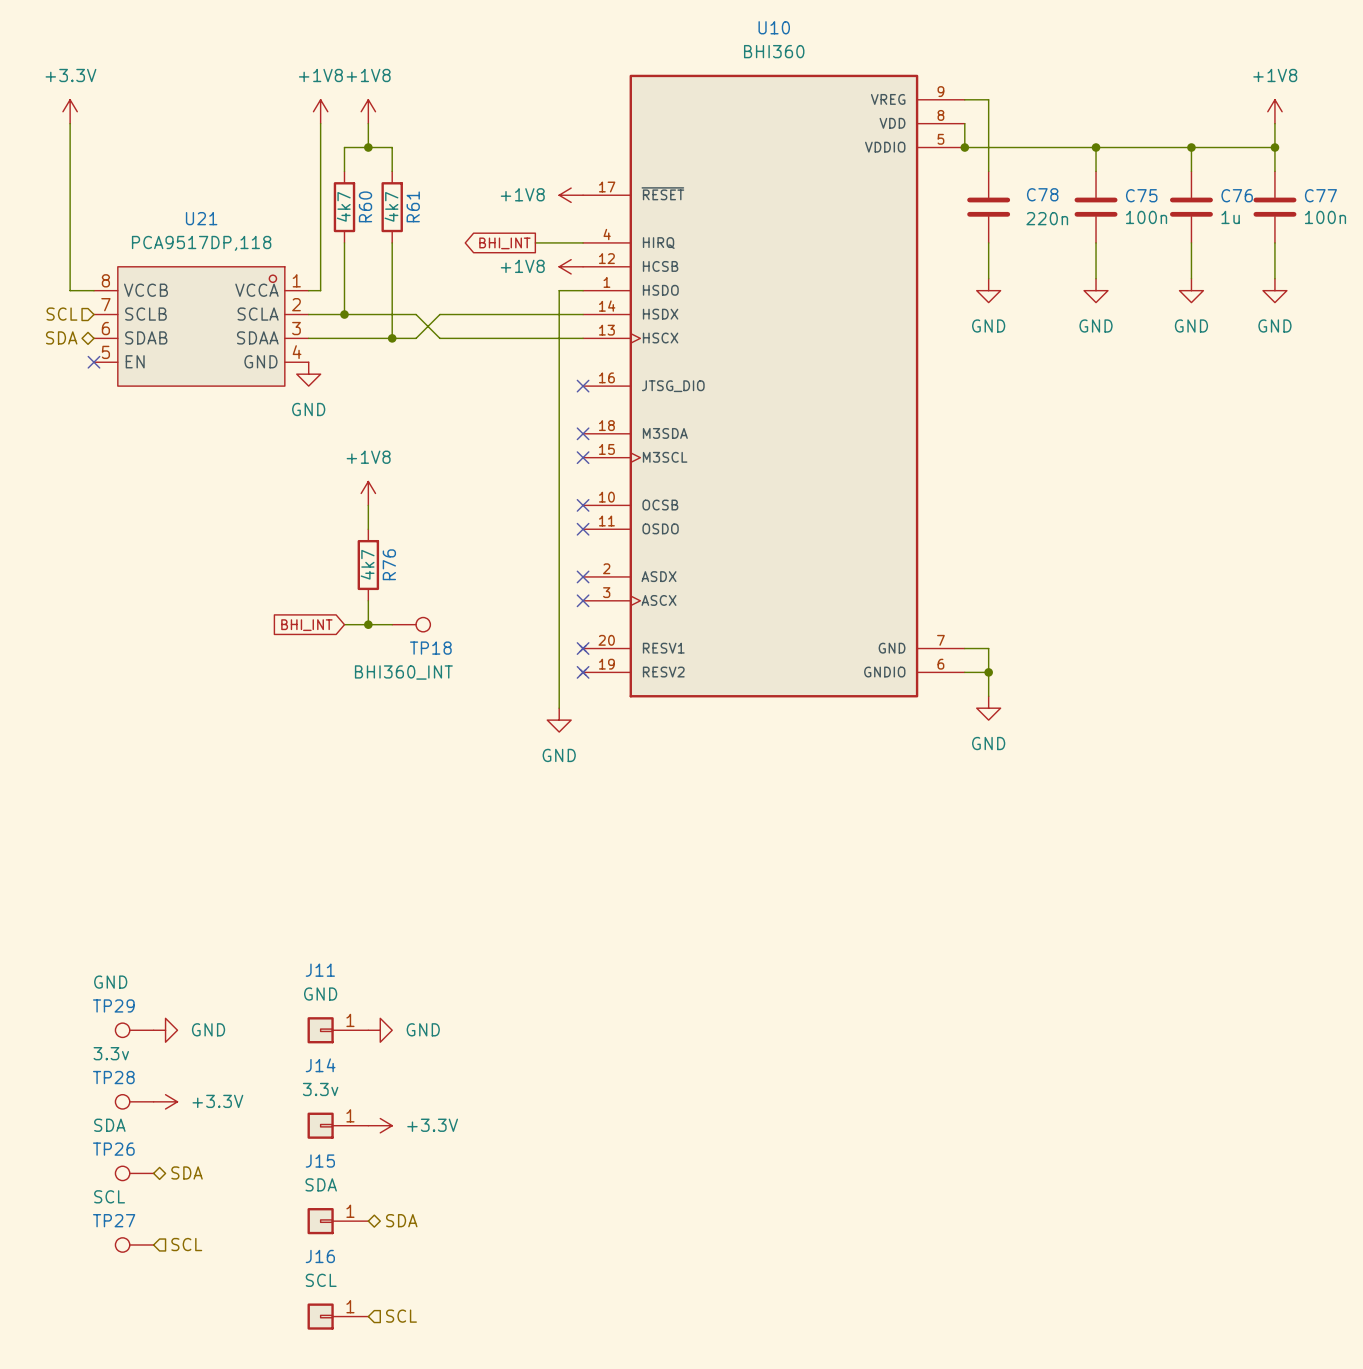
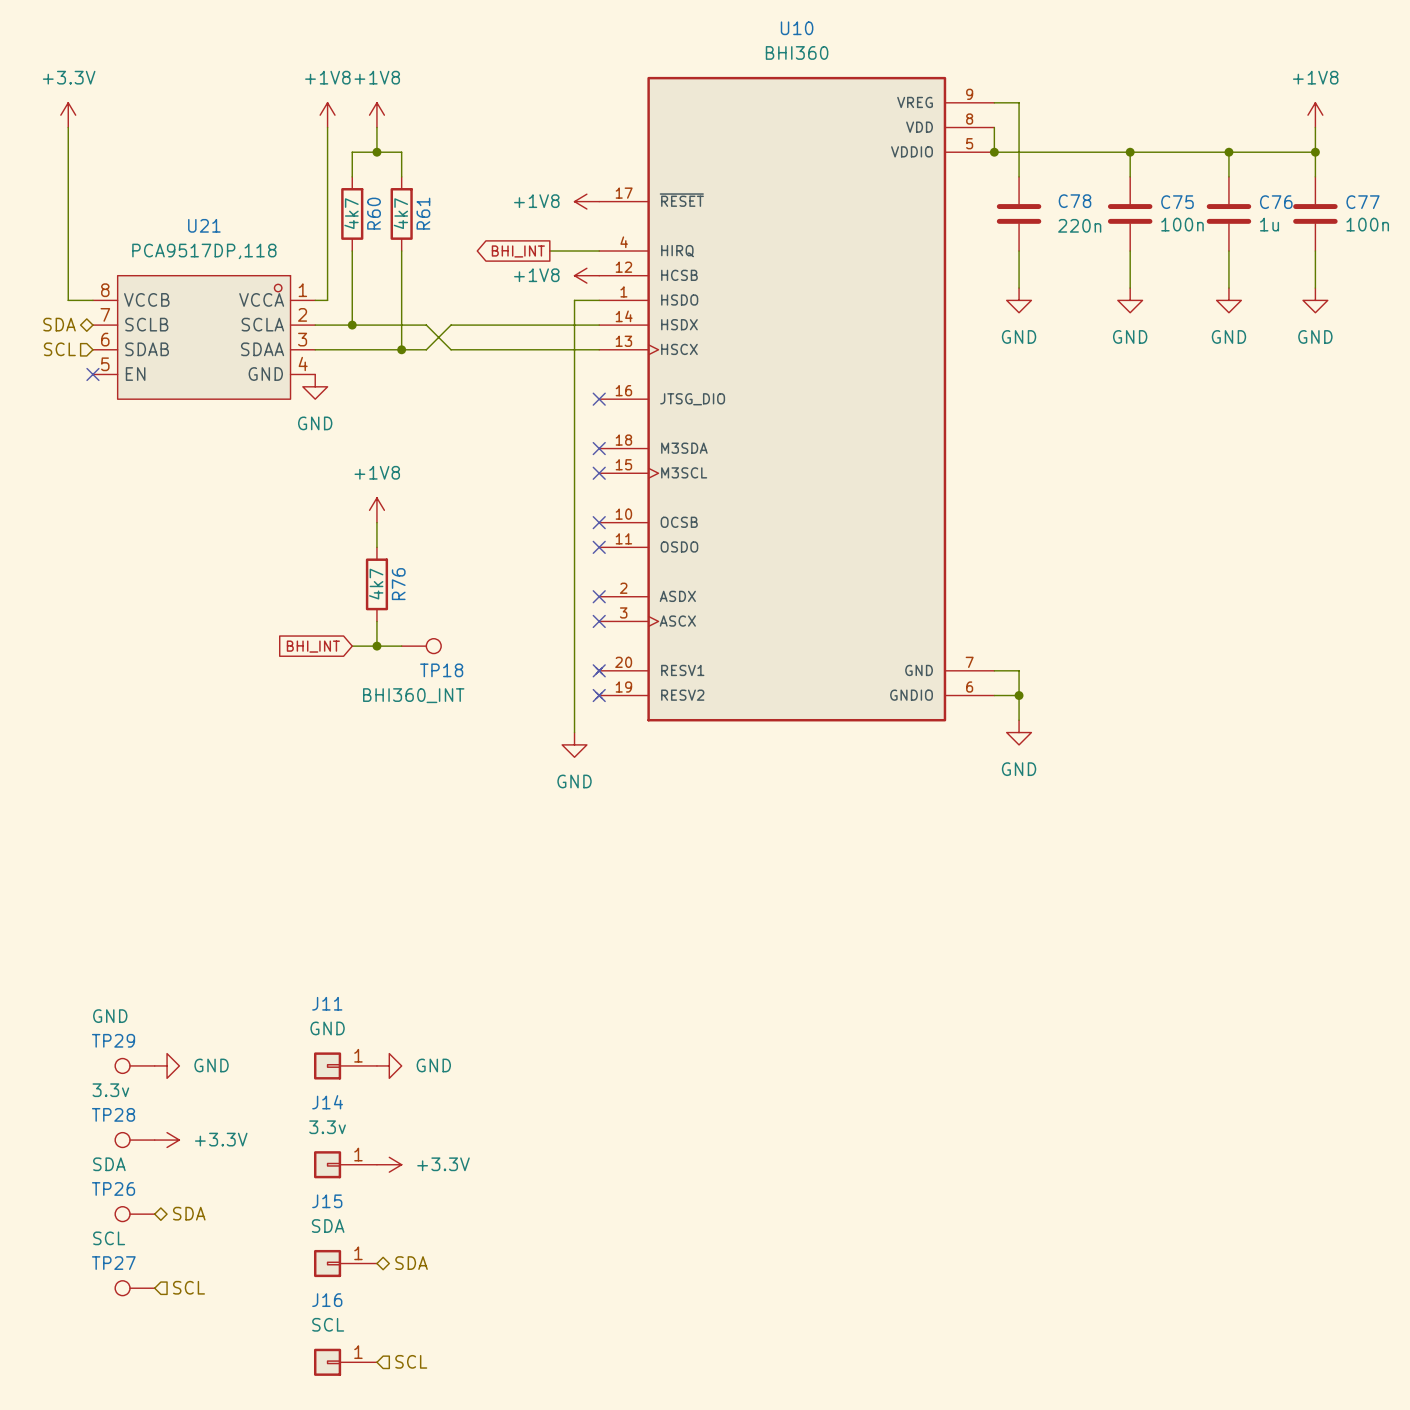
hierarchical label shape: input (61, 314) -> bidirectional (59, 324)
hierarchical label: SCL (61, 314) -> SDA (59, 324)
hierarchical label shape: bidirectional (61, 337) -> input (59, 349)
hierarchical label: SDA (61, 337) -> SCL (59, 349)

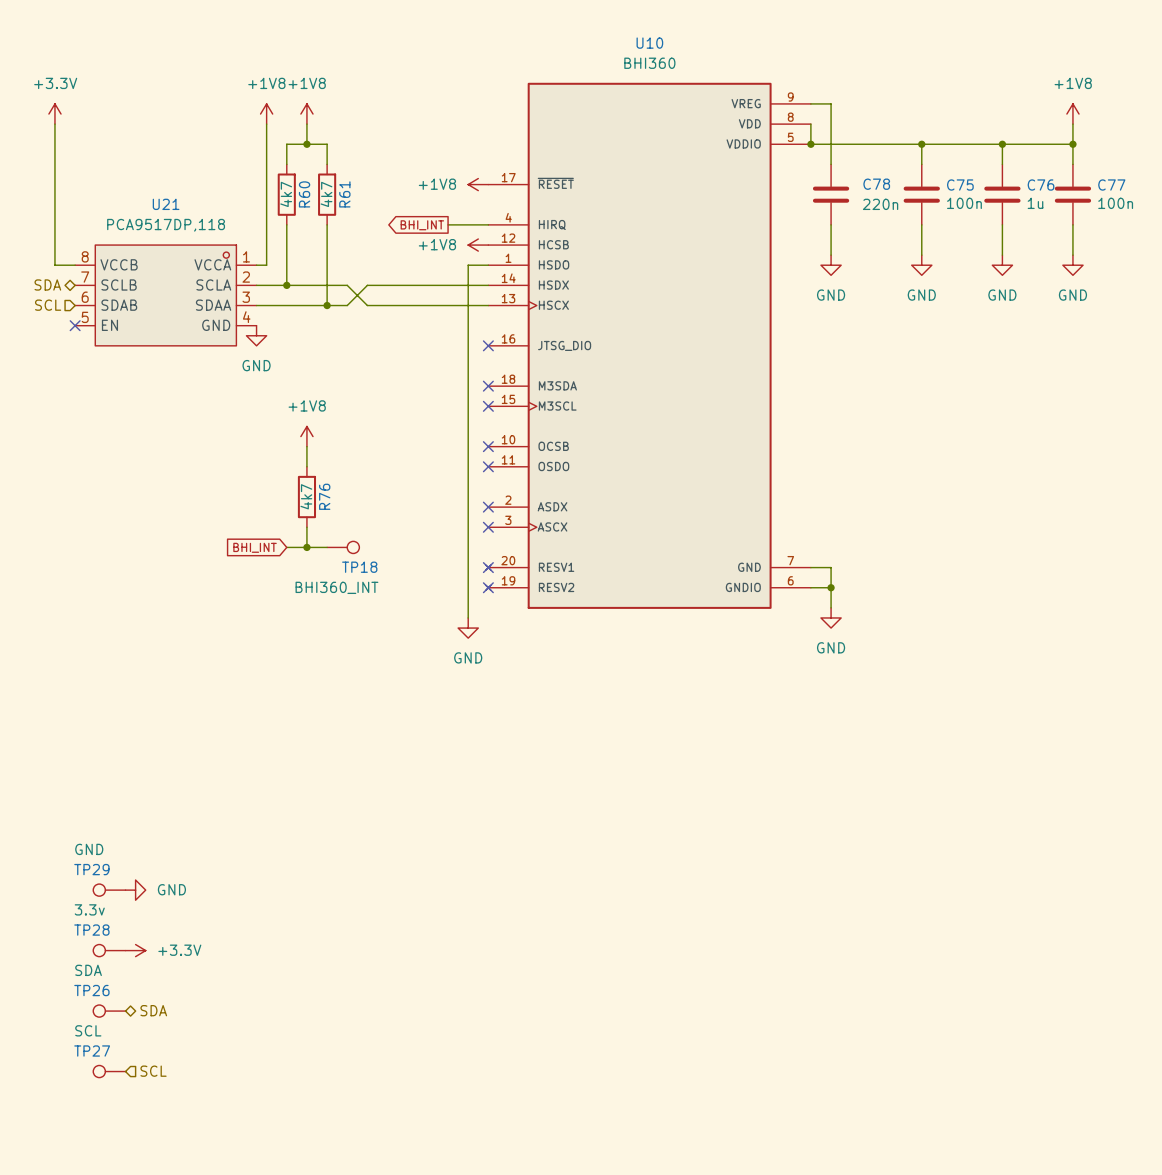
J11: GND (345, 1065) -> none
power symbol: GND (389, 1065) -> none
J14: 3.3v (345, 1164) -> none
power symbol: +3.3V (389, 1164) -> none
J15: SDA (345, 1263) -> none
hierarchical label: SDA (411, 1263) -> none
hierarchical label: SCL (411, 1361) -> none
J16: SCL (345, 1362) -> none

